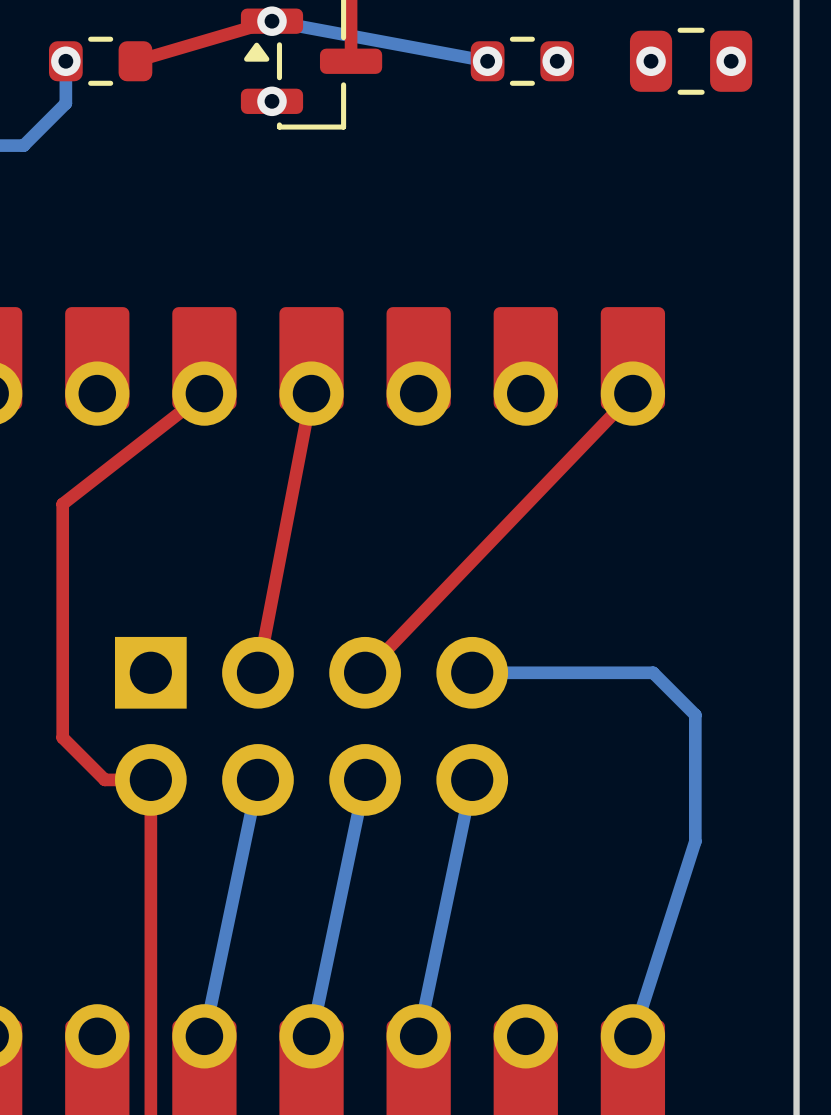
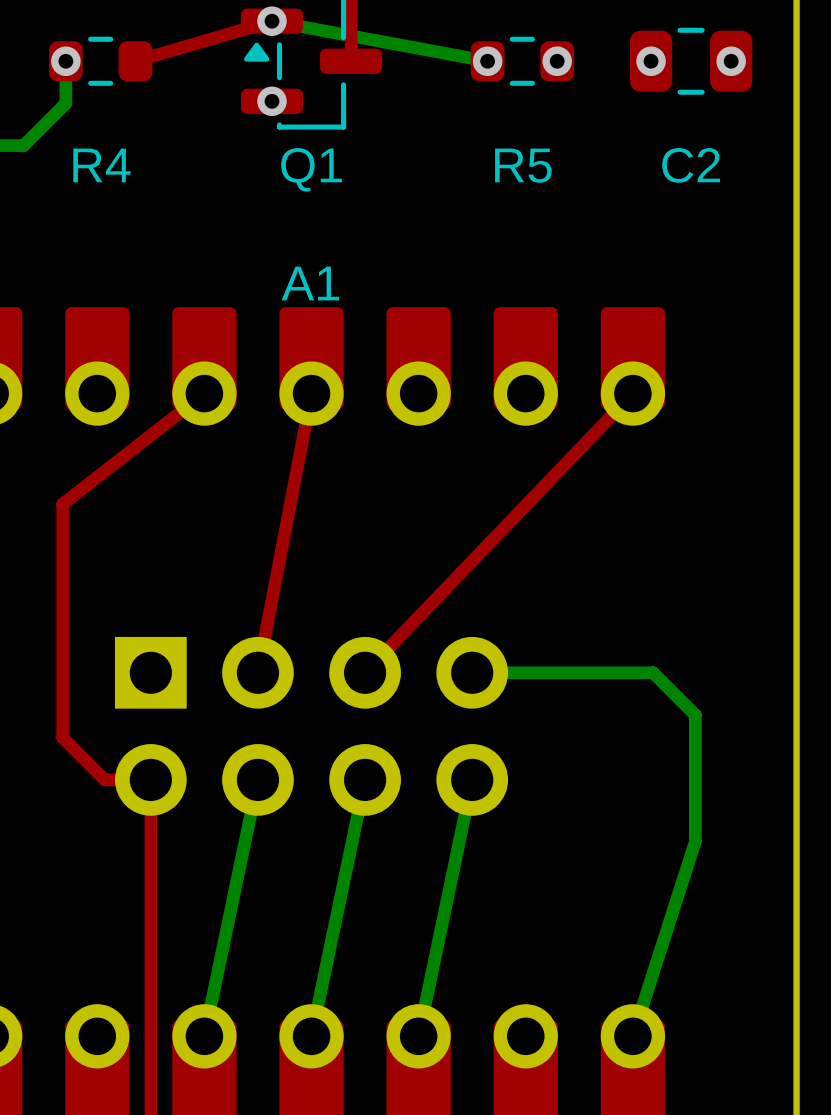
text: none -> R4 (101, 165)
text: none -> R5 (523, 165)
text: none -> C2 (691, 165)
text: none -> Q1 (311, 169)
text: none -> A1 (310, 283)

